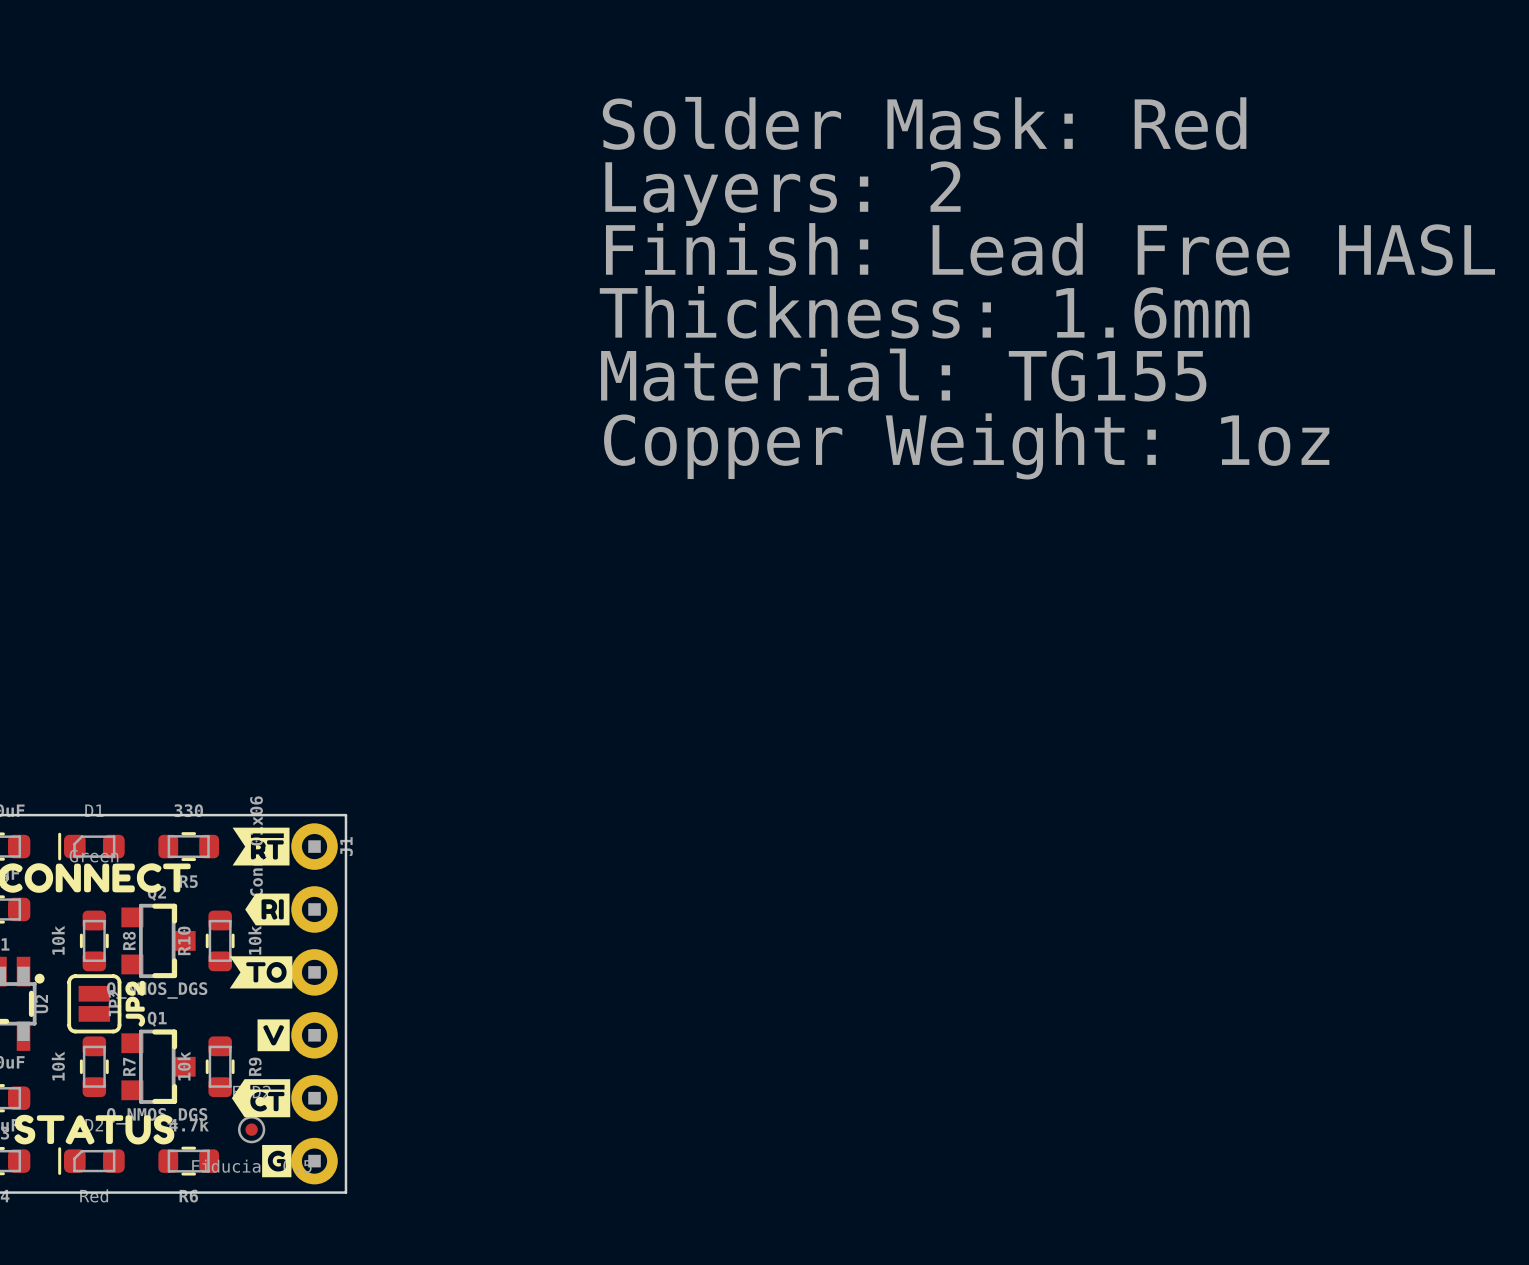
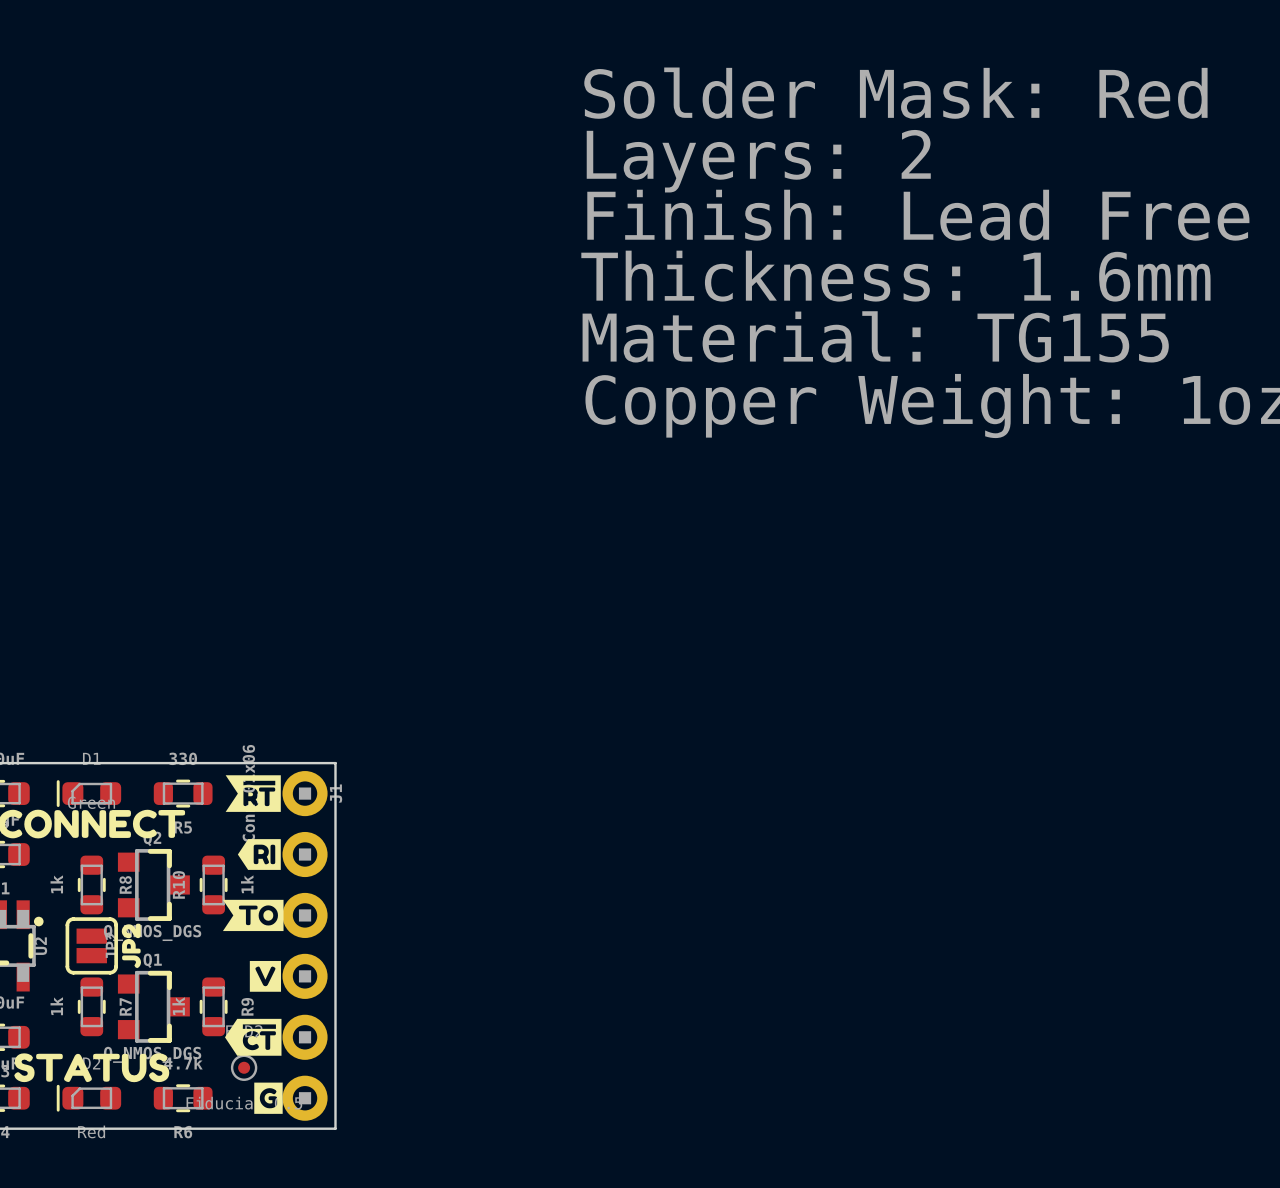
R8 value: 10k (58, 940) -> 1k (56, 884)
R10 value: 10k (254, 940) -> 1k (247, 884)
R7 value: 10k (58, 1066) -> 1k (56, 1006)
R9 value: 10k (184, 1066) -> 1k (178, 1006)

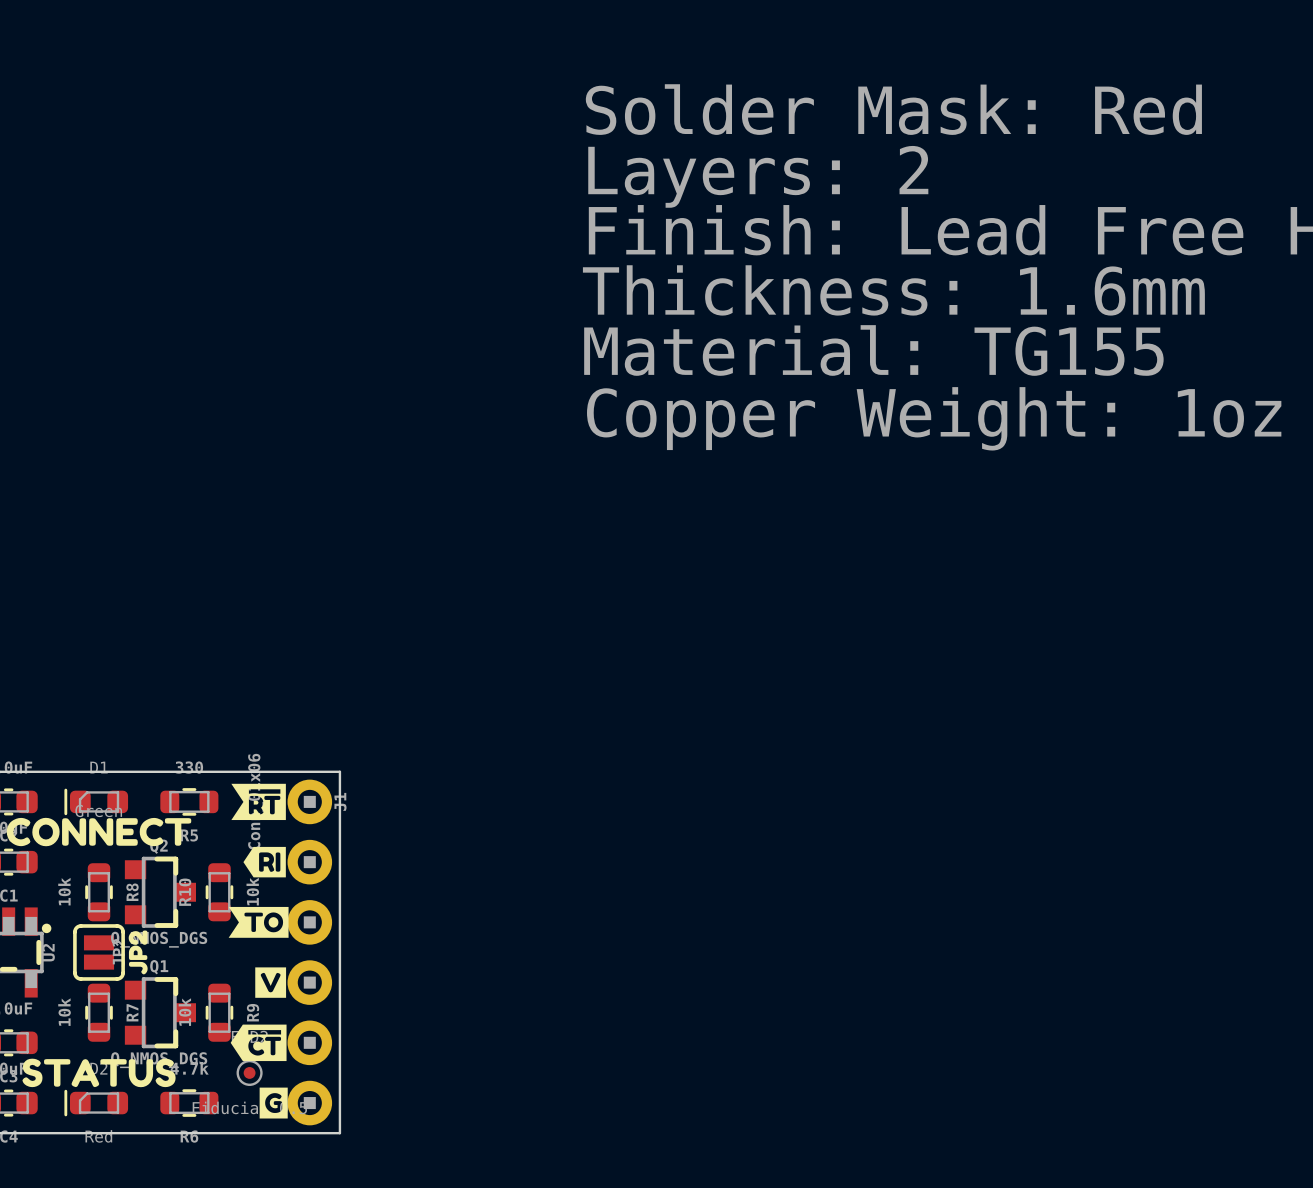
R8 value: 1k (56, 884) -> 10k (64, 891)
R10 value: 1k (247, 884) -> 10k (252, 891)
R7 value: 1k (56, 1006) -> 10k (64, 1012)
R9 value: 1k (178, 1006) -> 10k (184, 1012)

